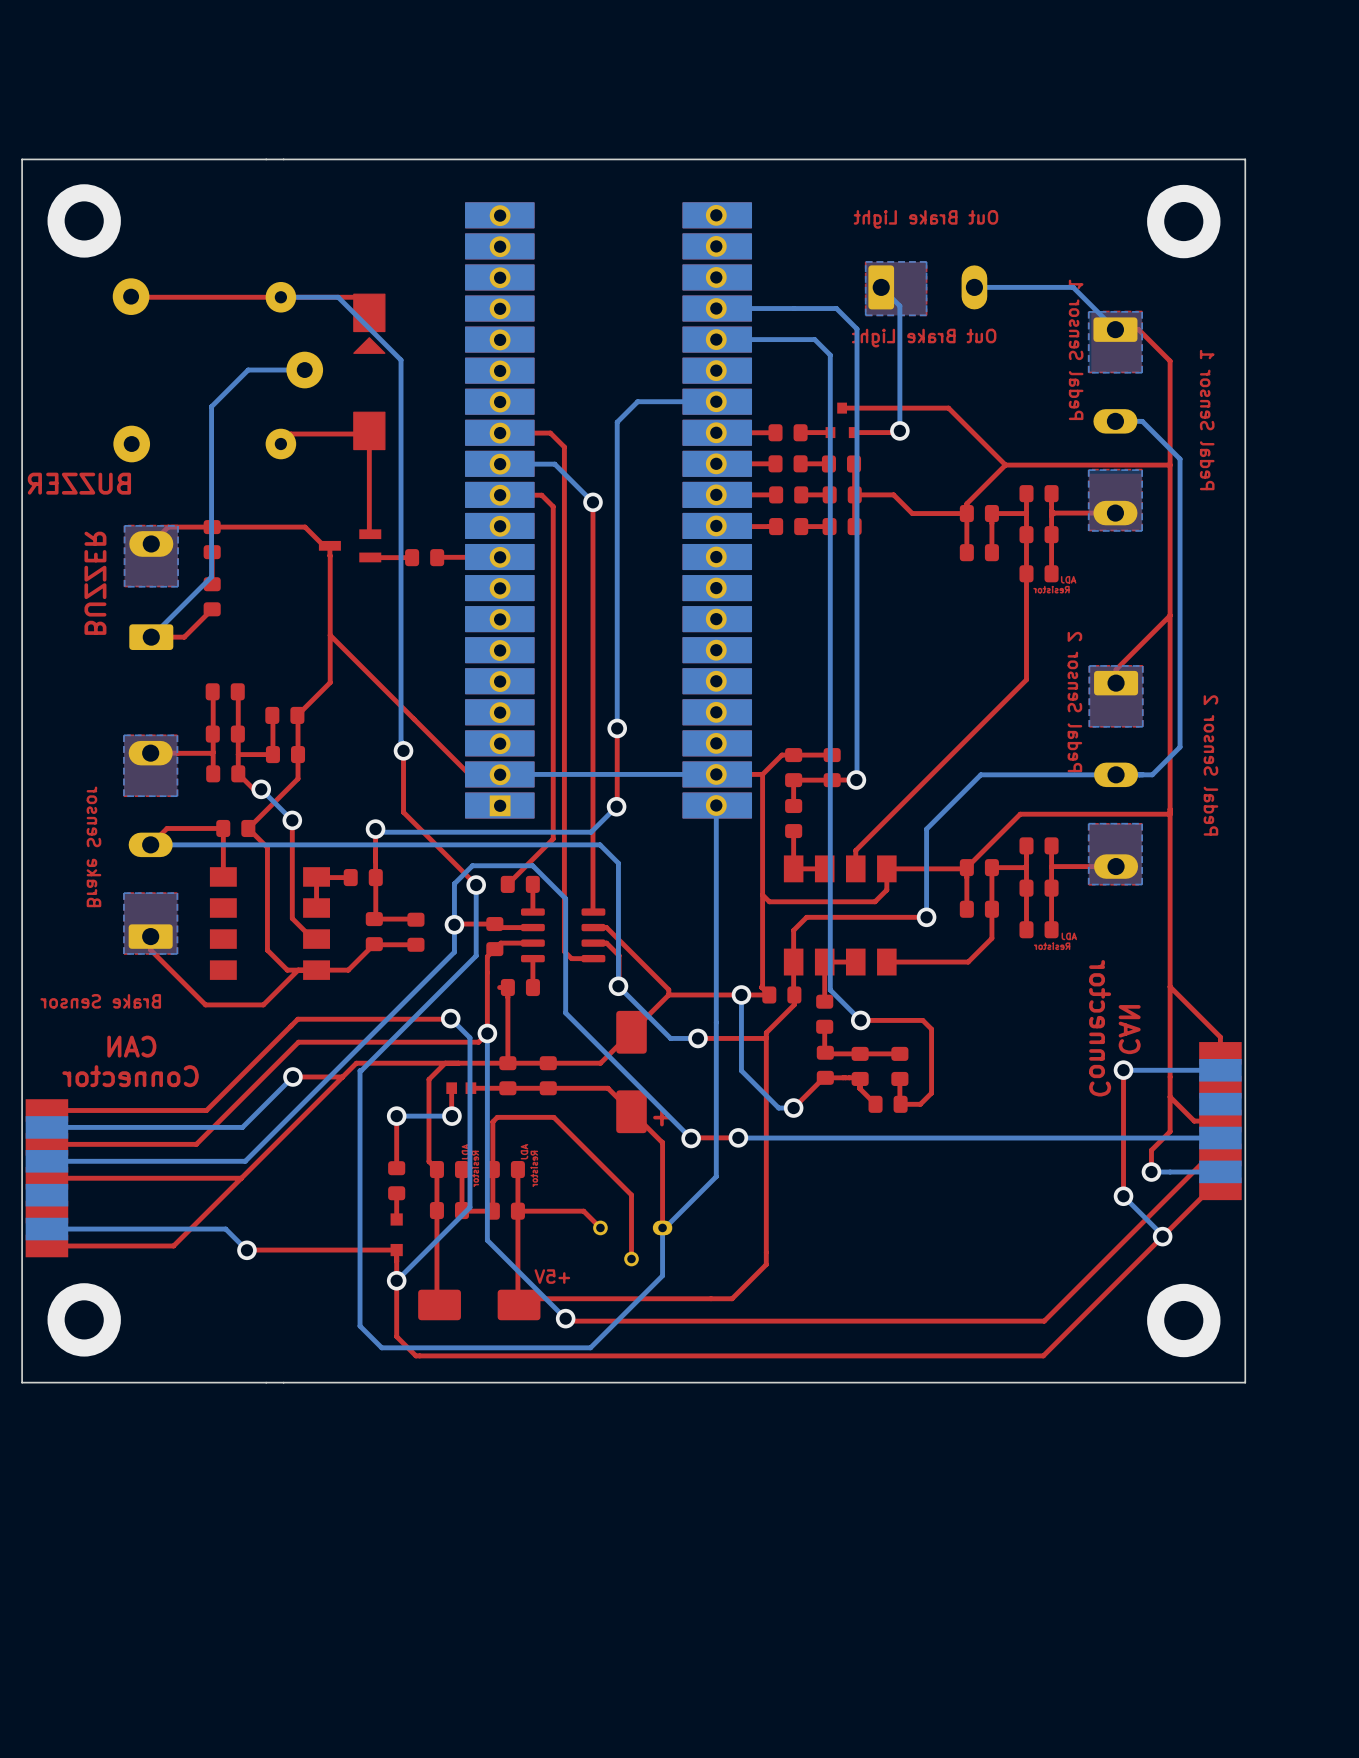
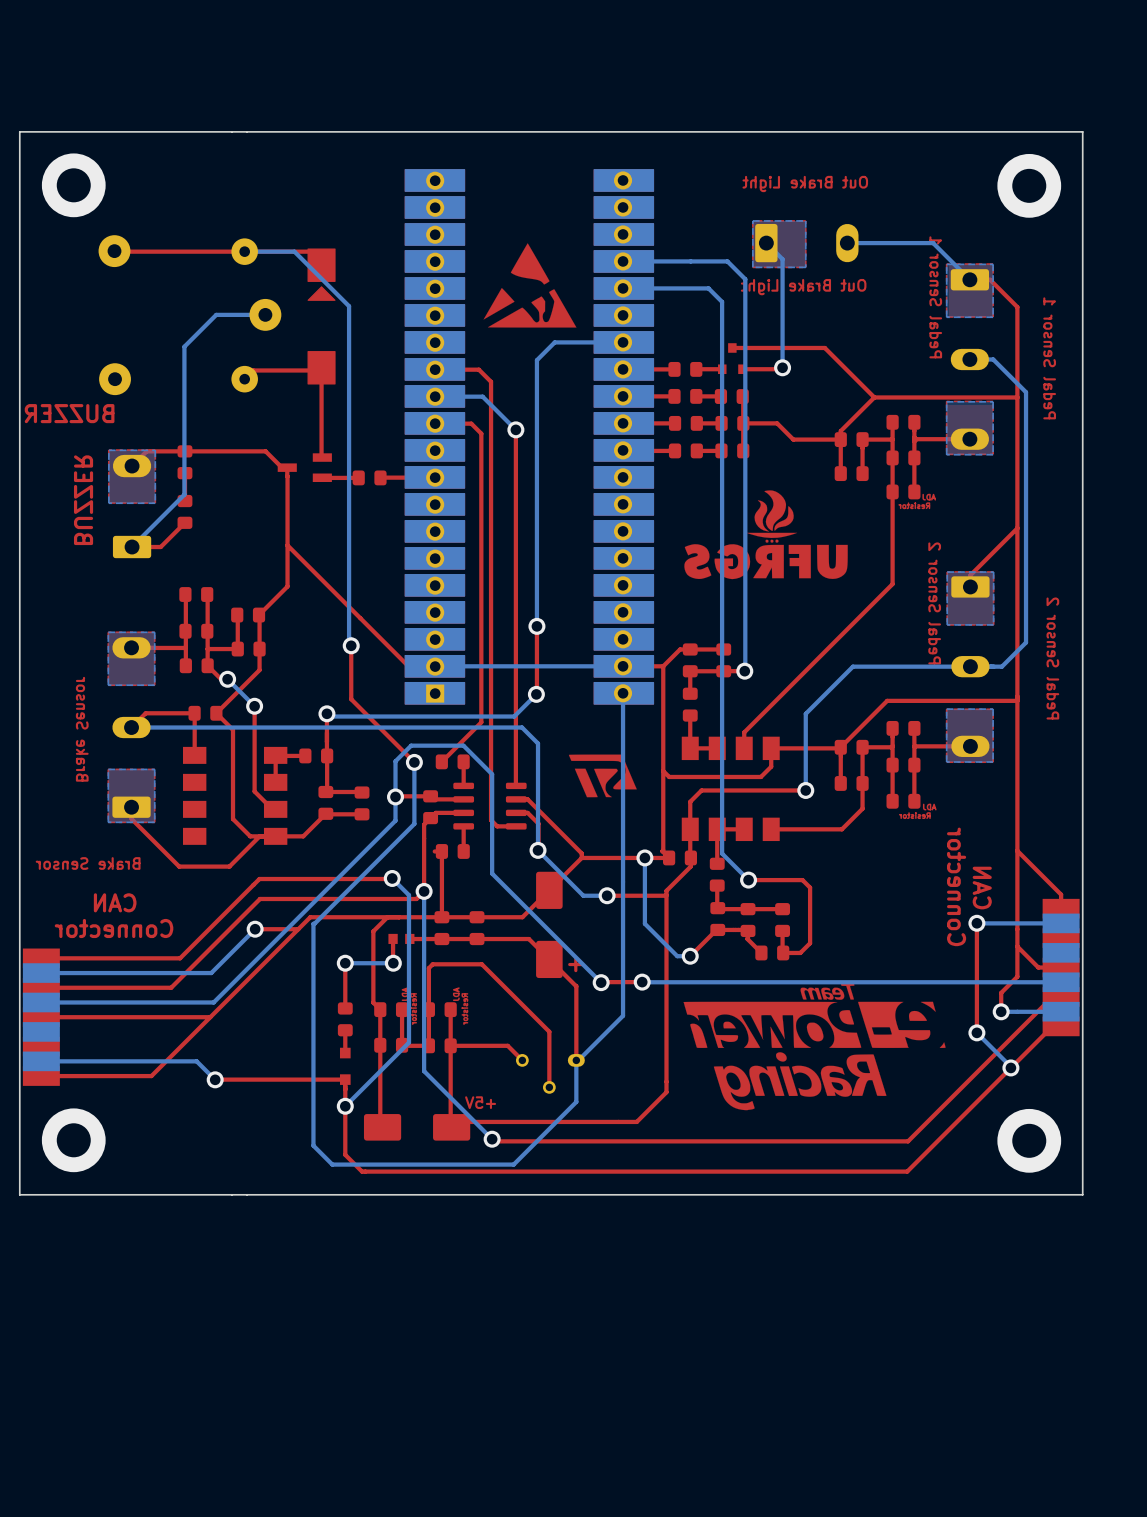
drawing: none -> [483, 243, 577, 328]
drawing: none -> [684, 490, 848, 580]
drawing: none -> [568, 754, 637, 798]
drawing: none -> [683, 983, 946, 1111]

